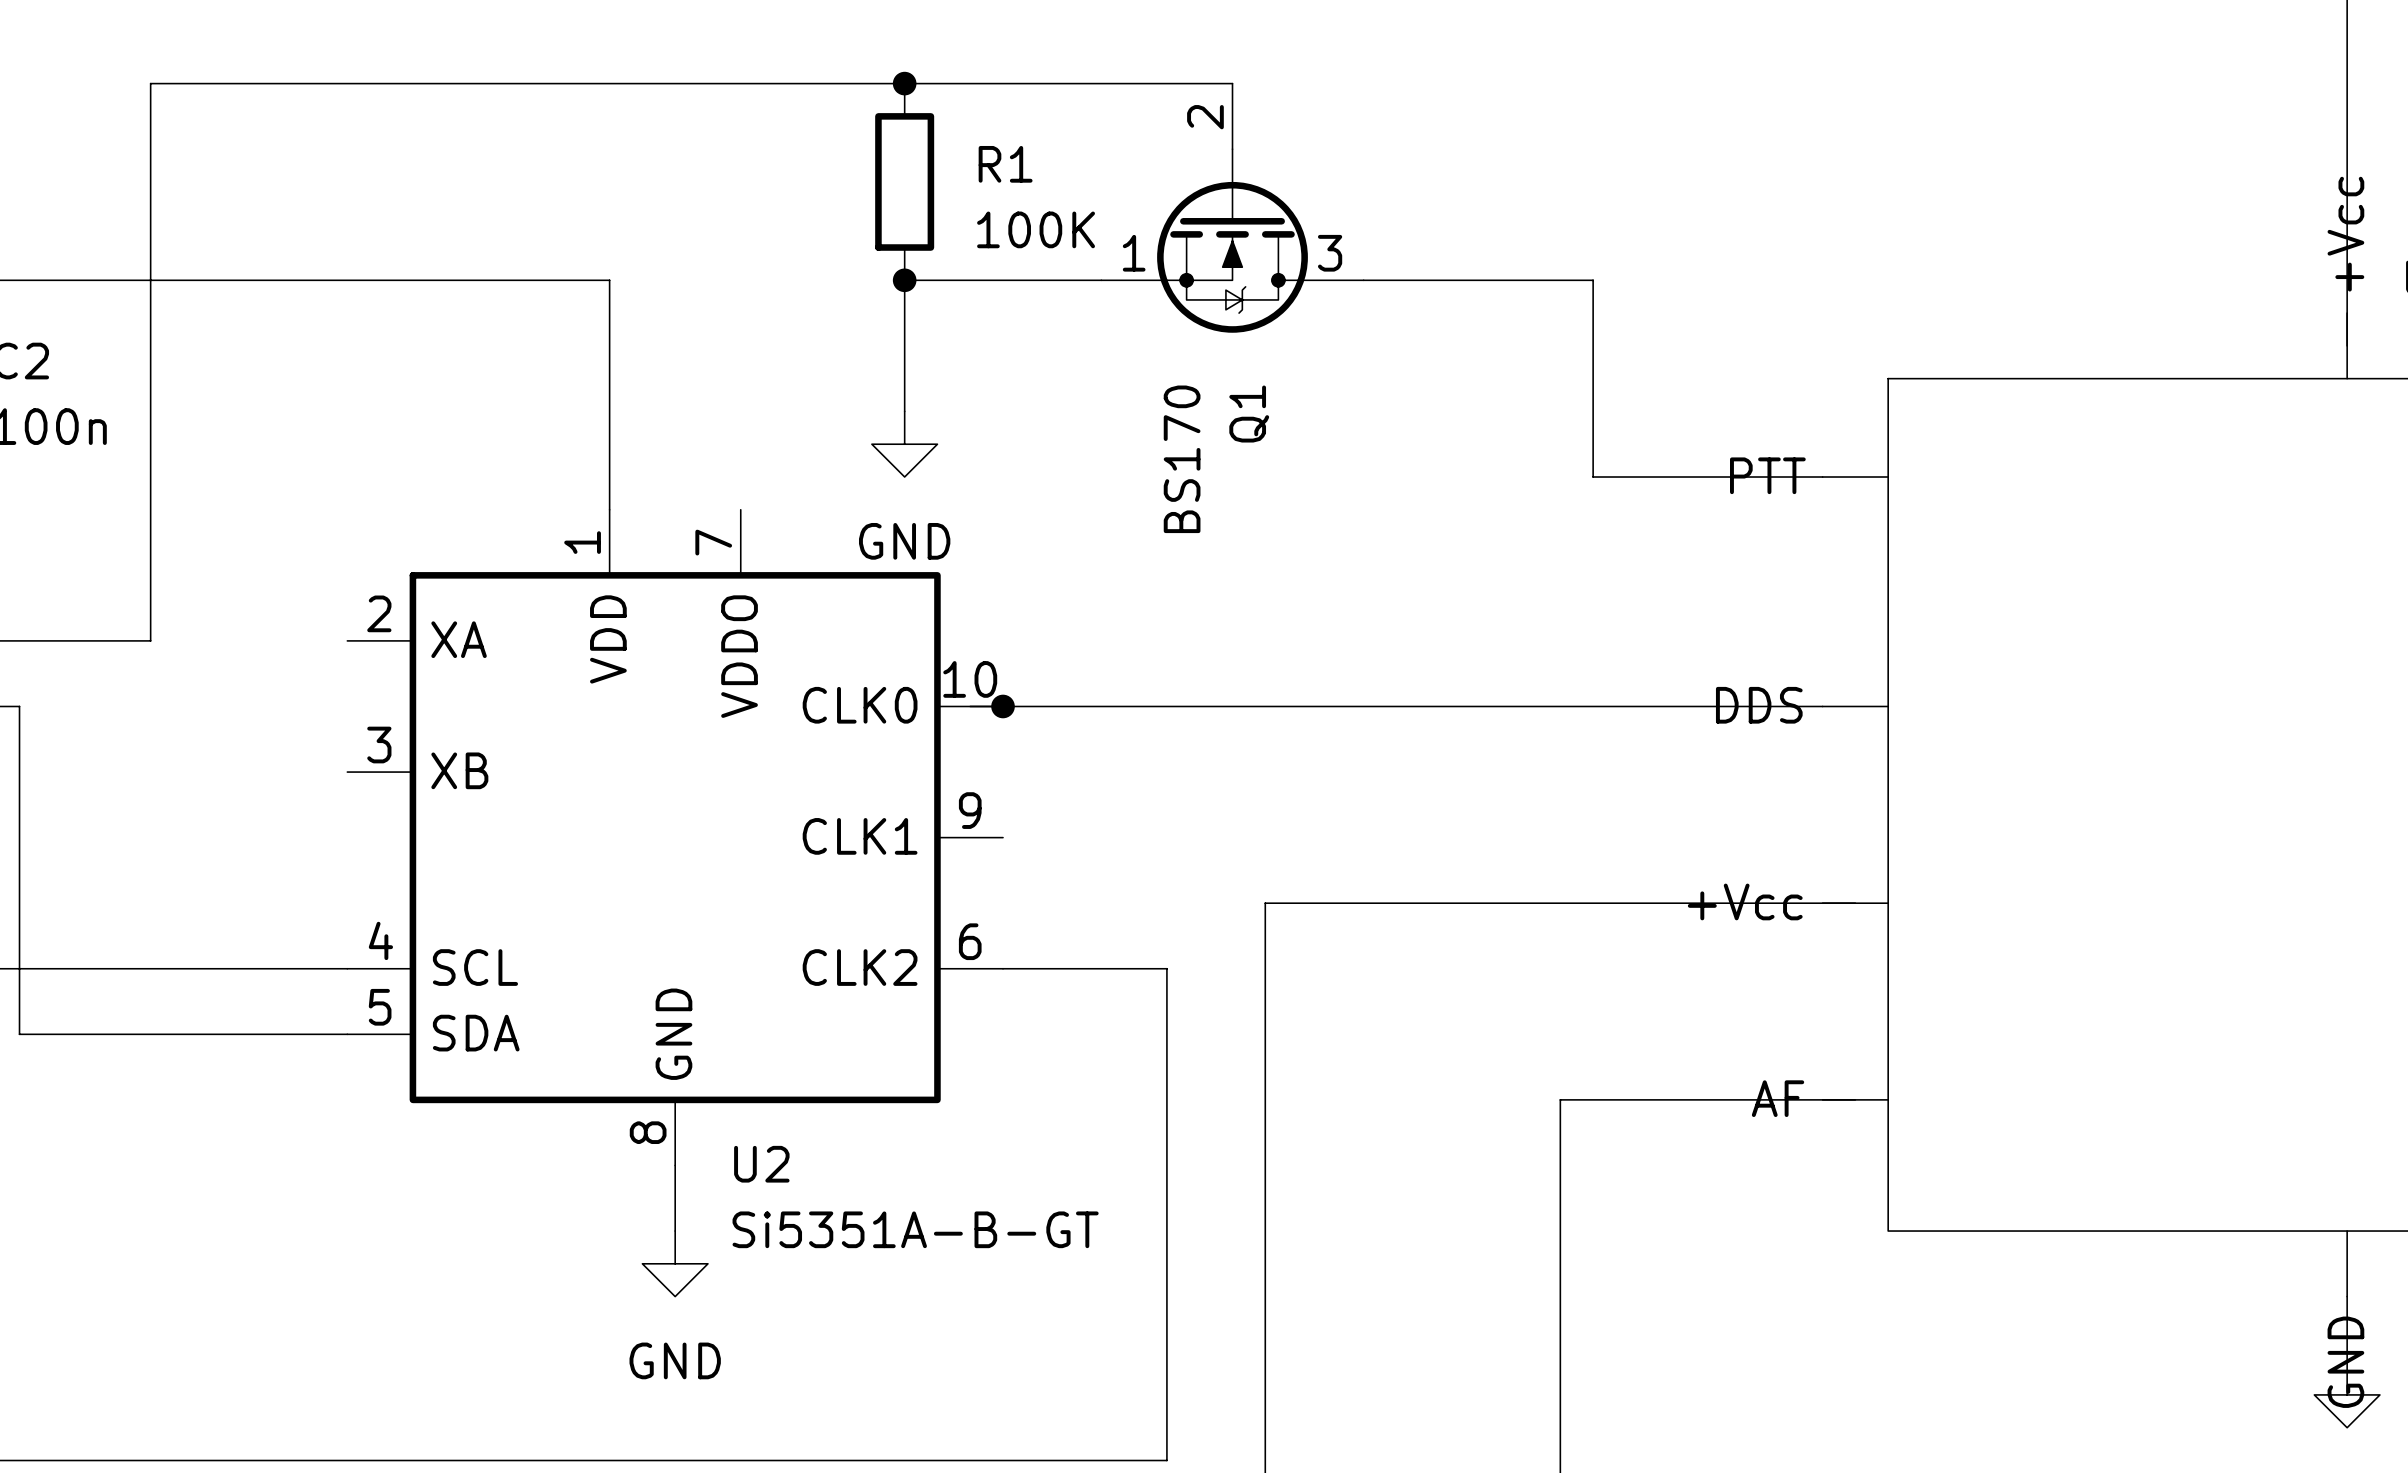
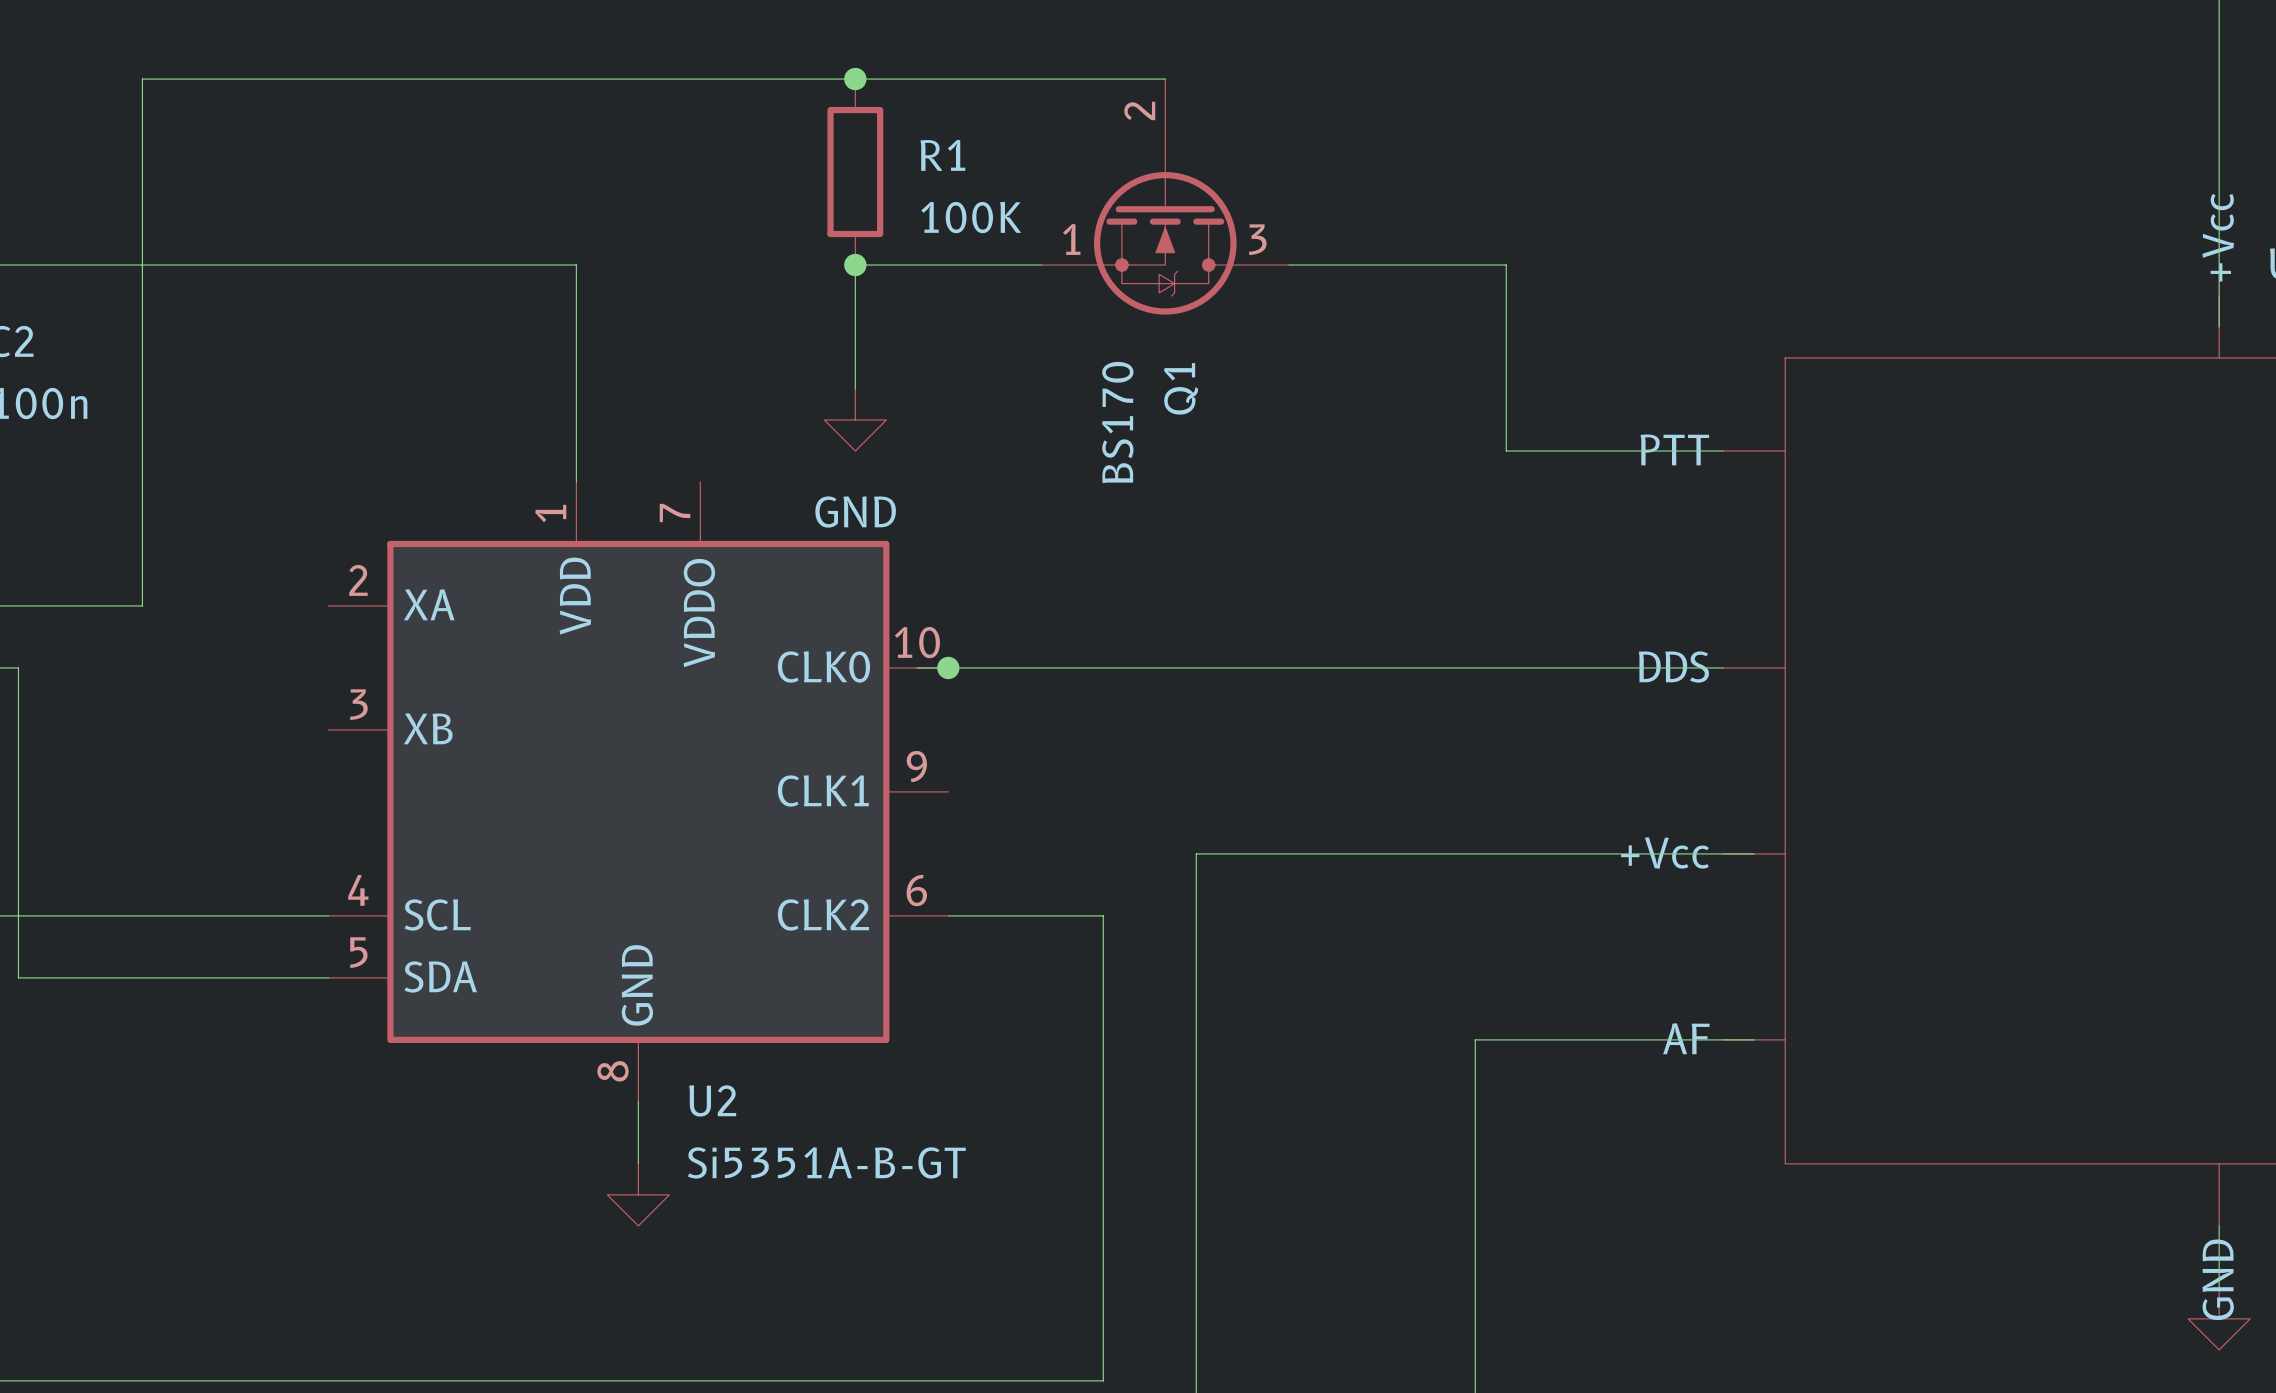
power symbol text: GND (675, 1360) -> none

